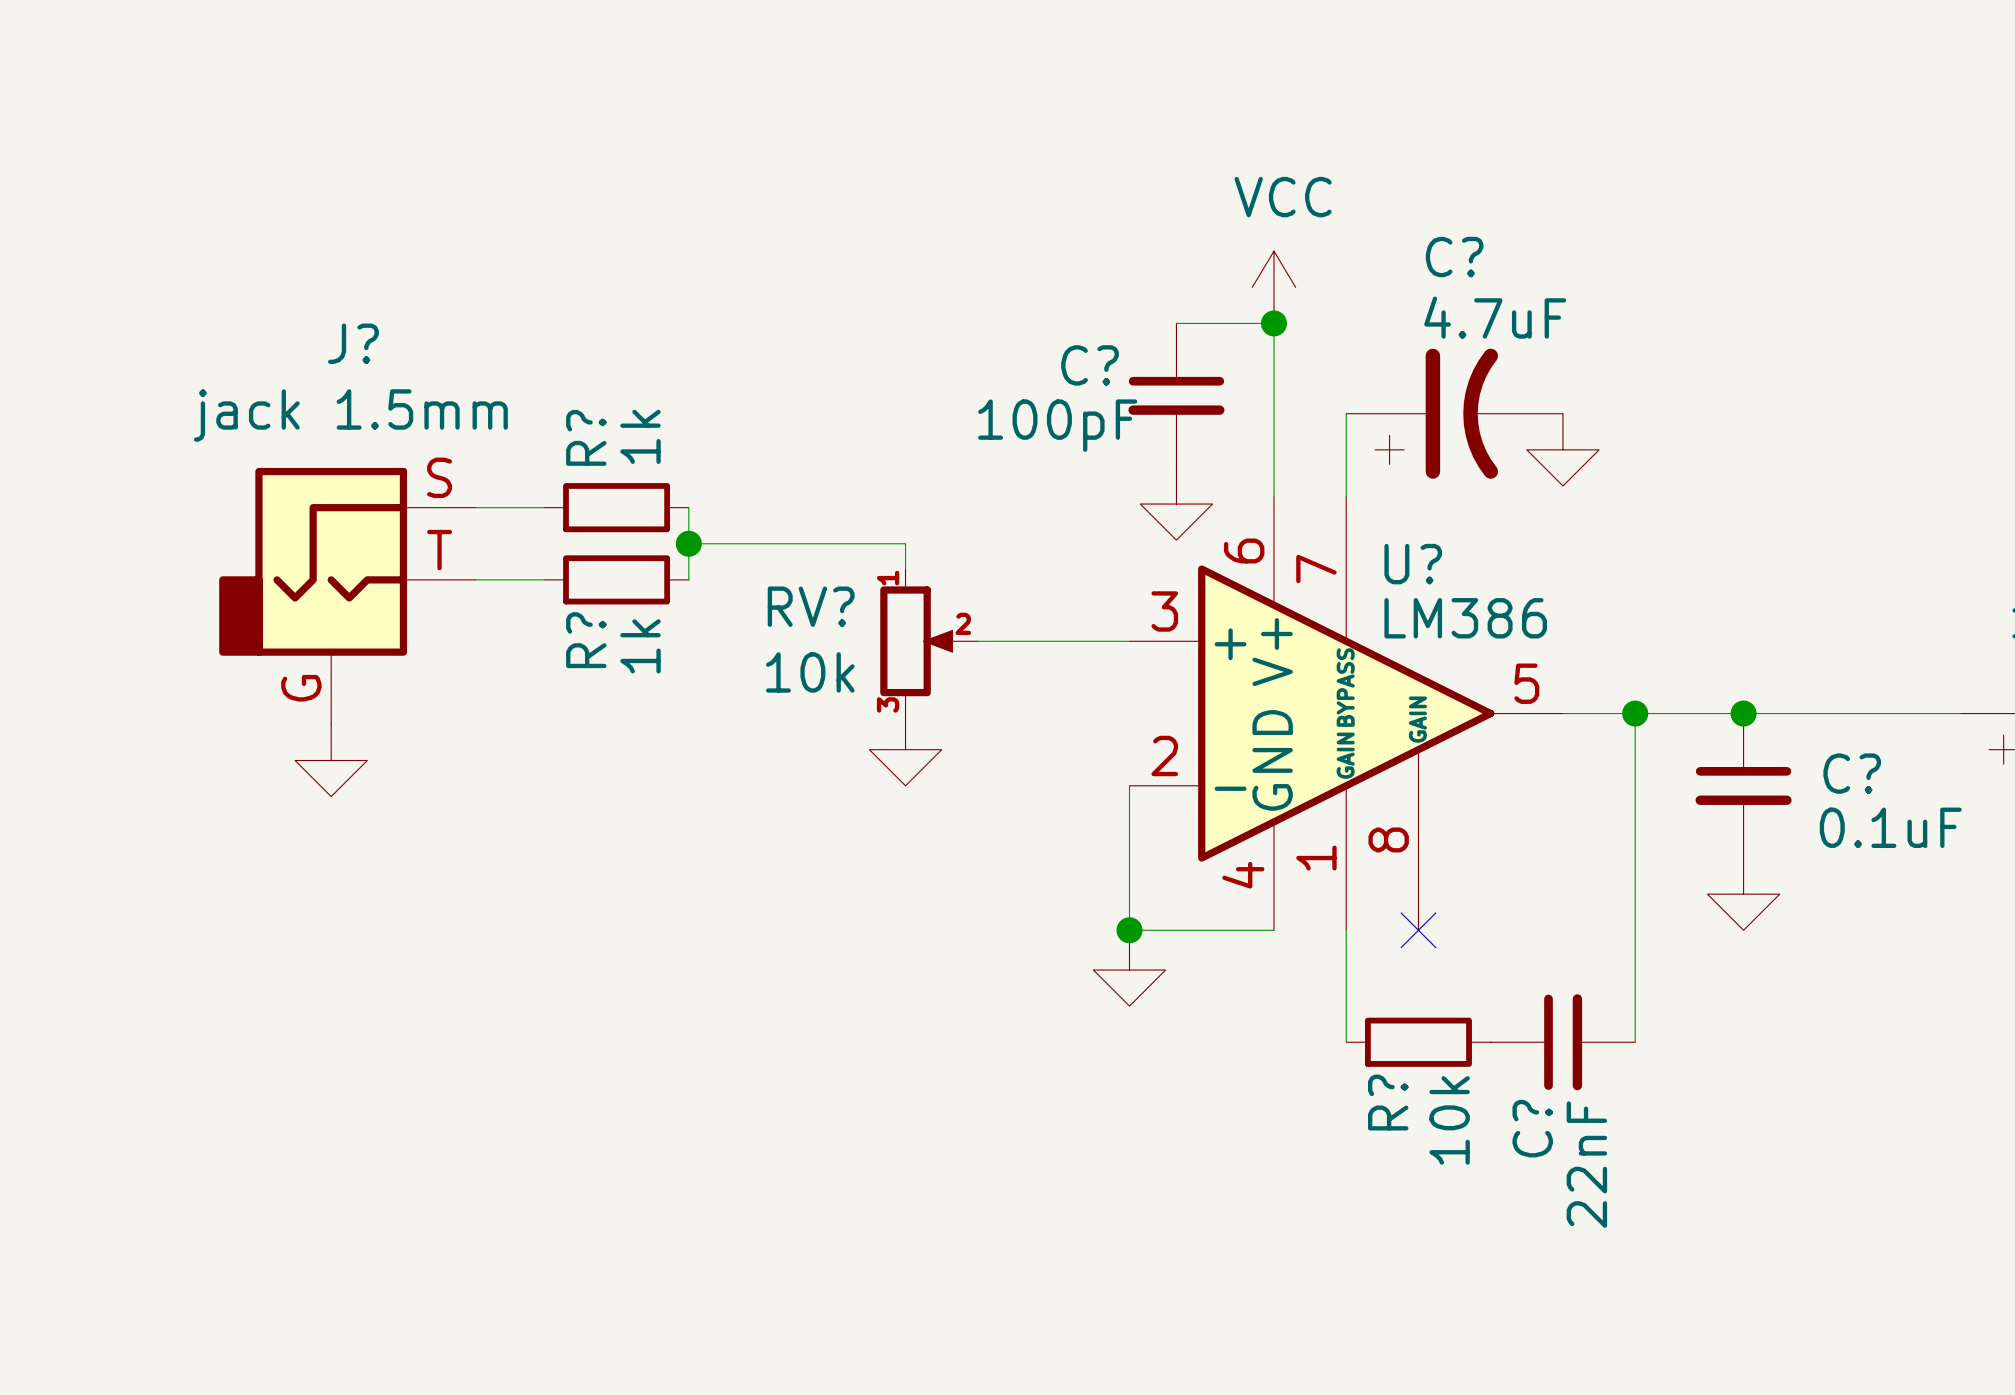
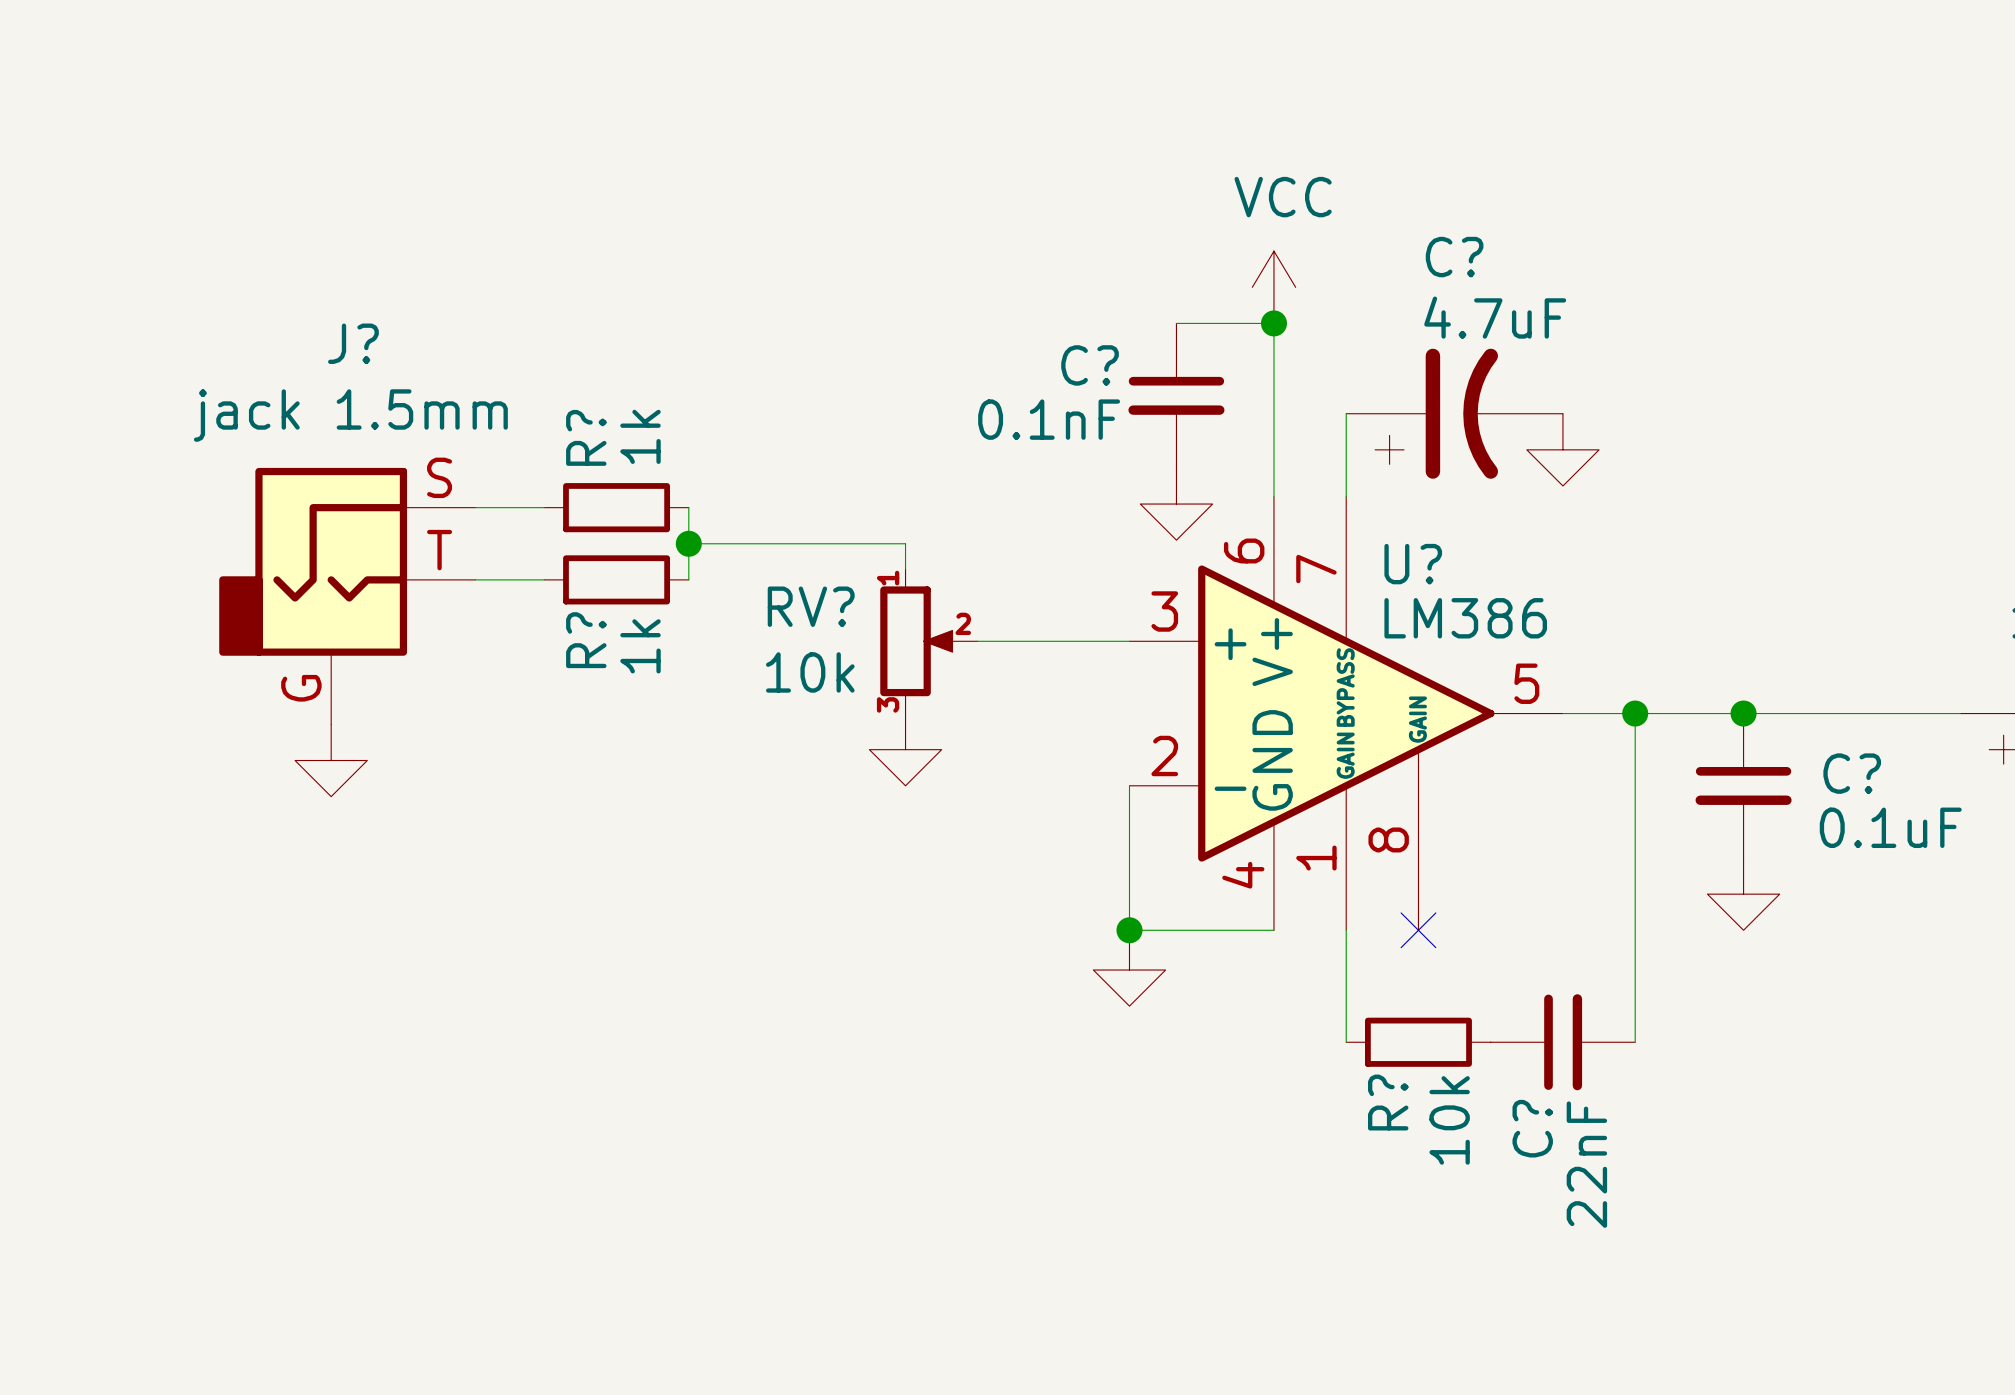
C? value: 100pF (1057, 425) -> 0.1nF (1049, 419)

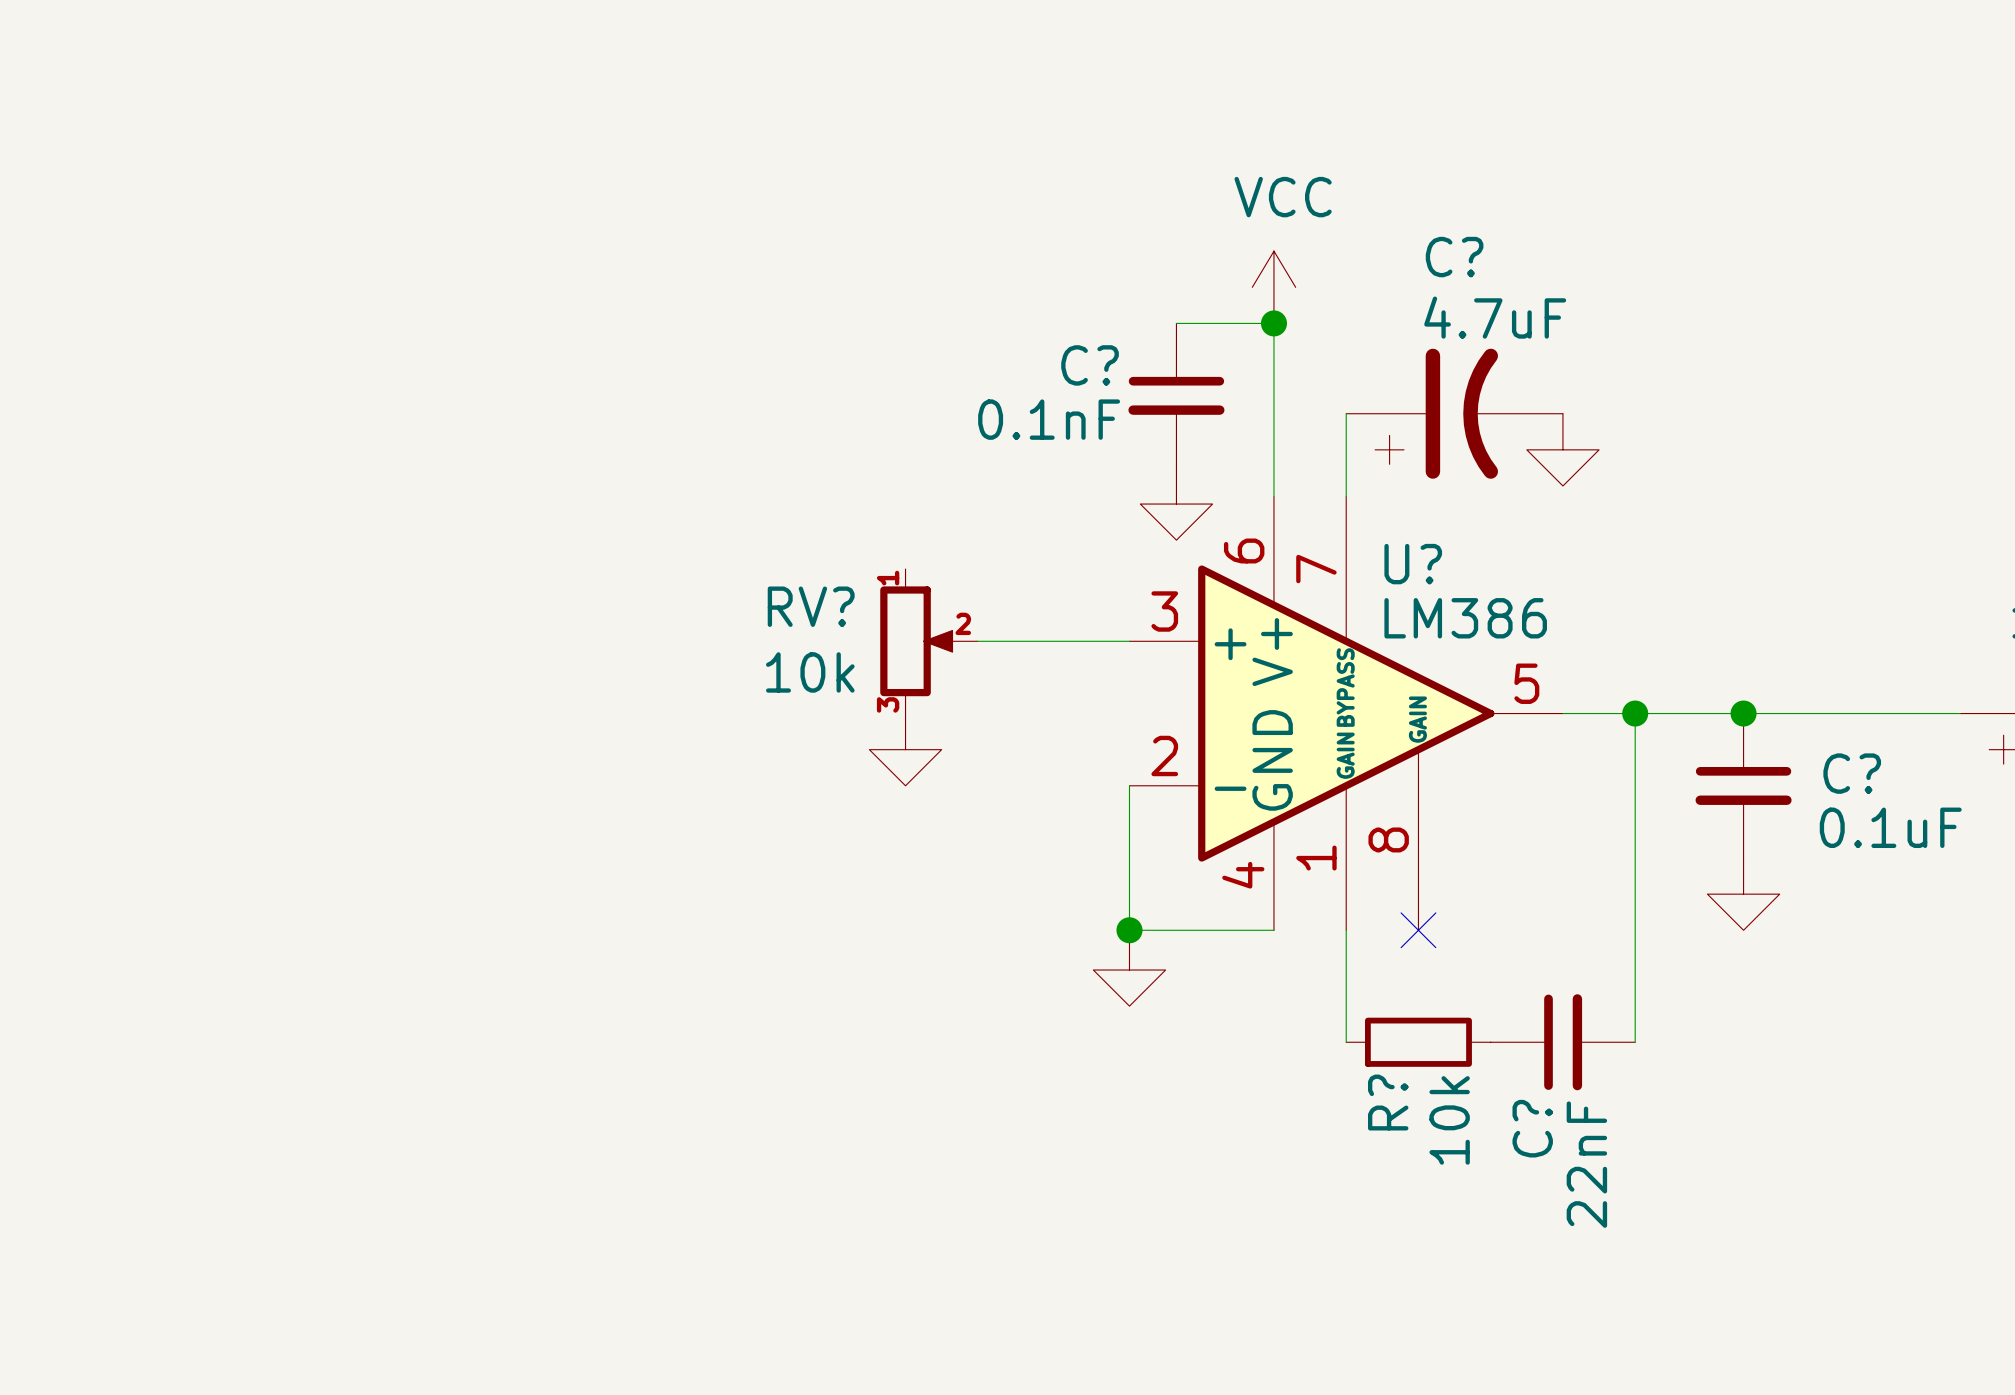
wire: (475, 507) (544, 507) -> none
R?: 1k (616, 507) -> none
wire: (688, 507) (688, 579) -> none
wire: (688, 543) (905, 543) (905, 569) -> none
junction: (688, 543) -> none
wire: (475, 579) (544, 579) -> none
R?: 1k (616, 579) -> none
J?: jack 1.5mm (347, 596) -> none
power symbol: (331, 760) -> none

